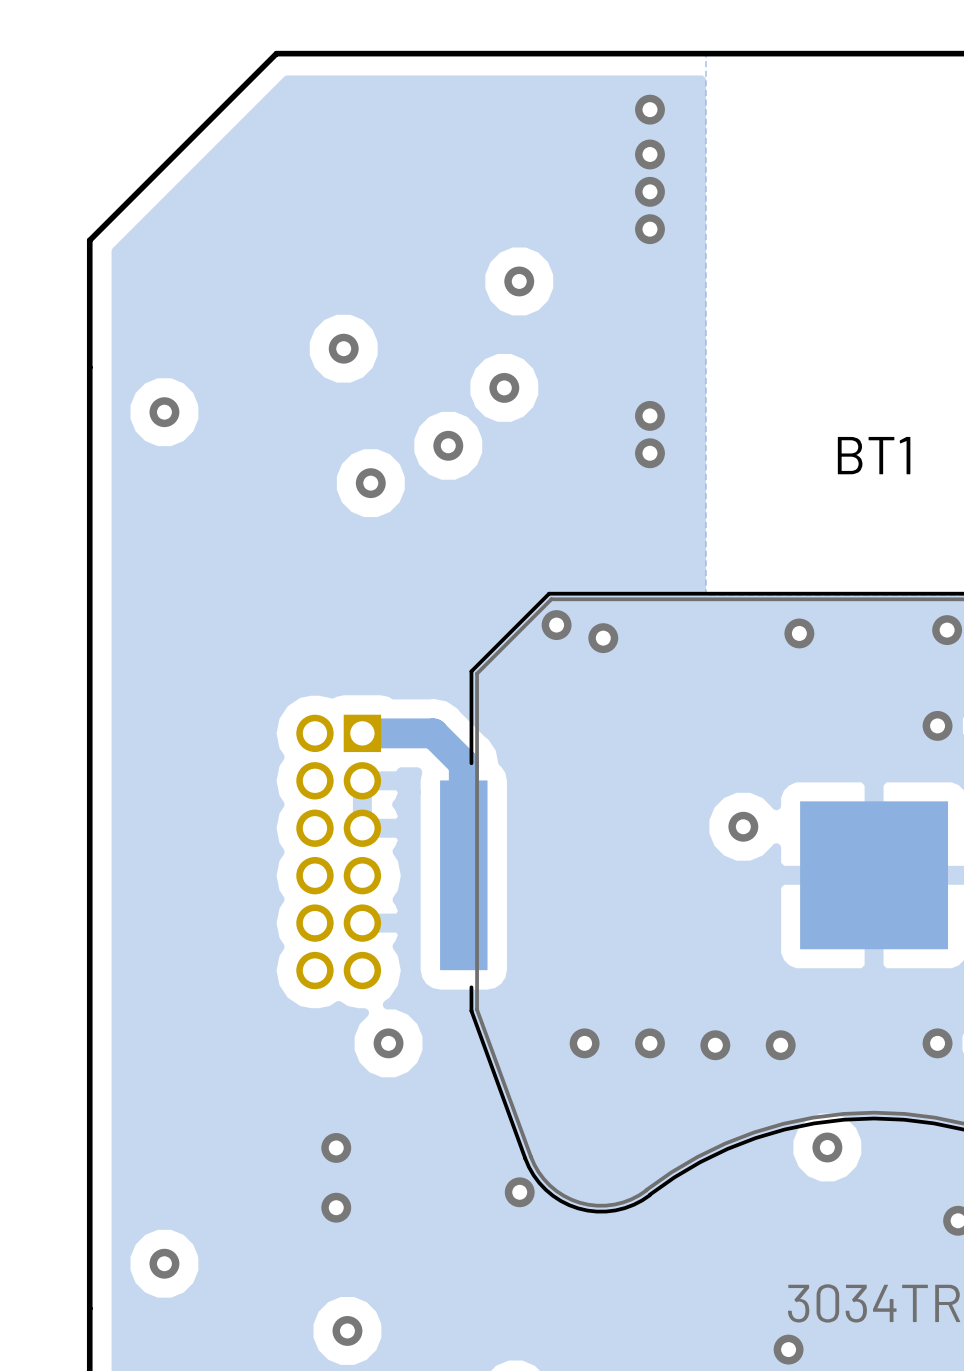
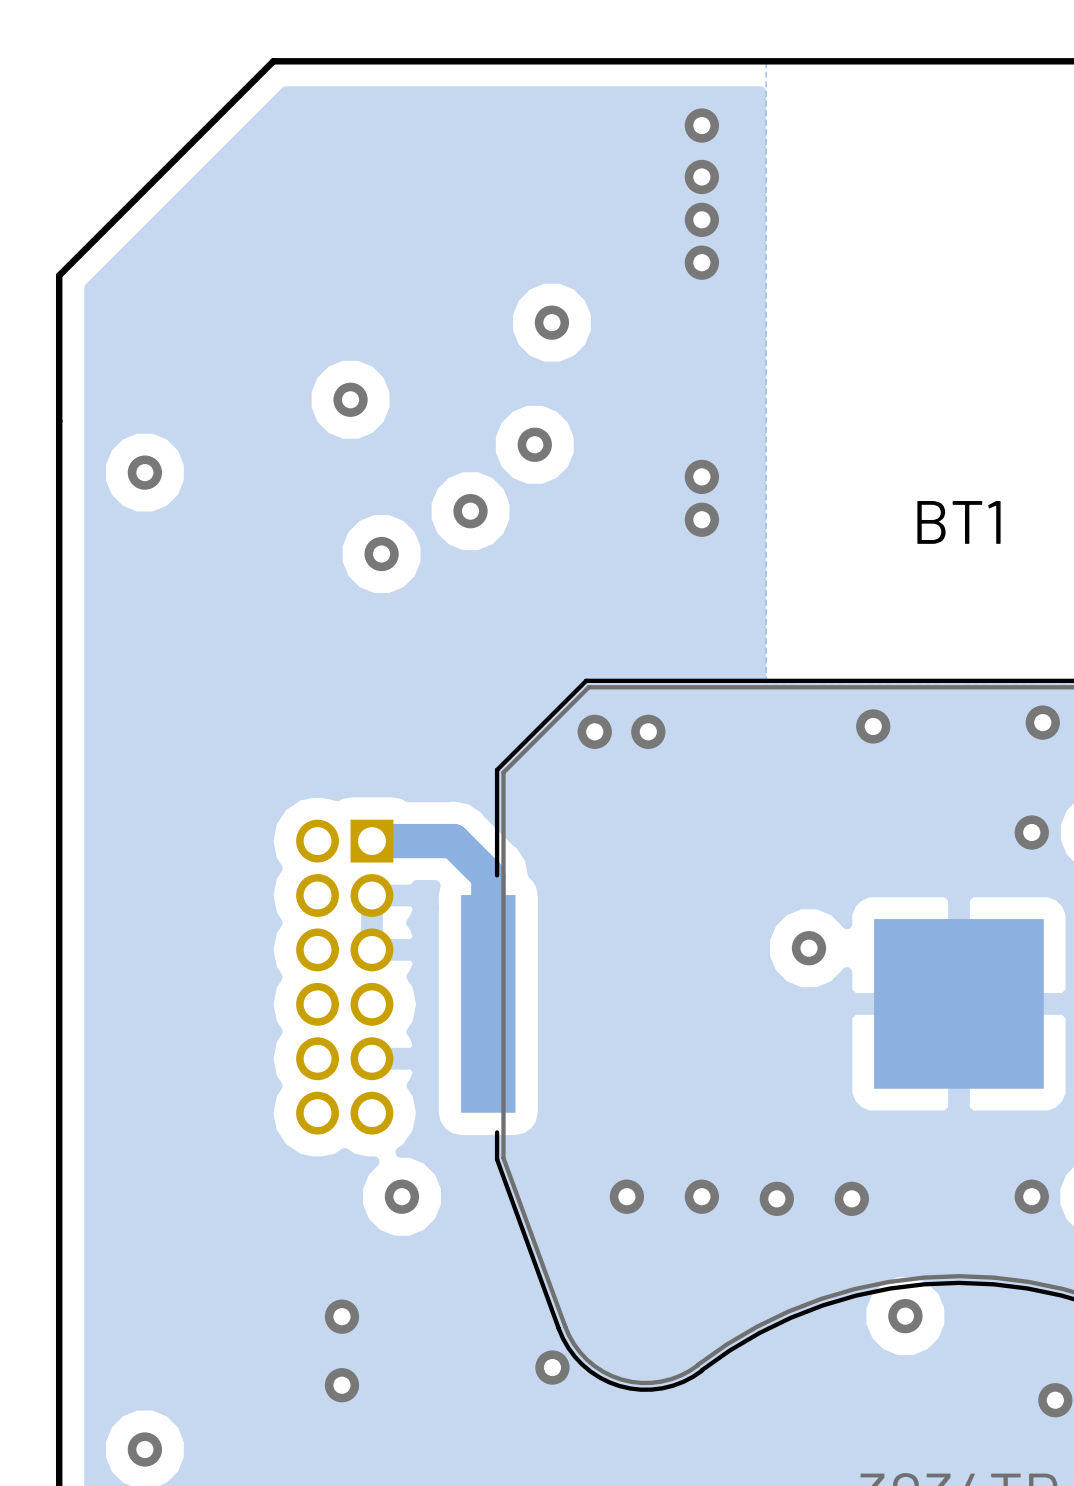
via position: (556, 625) -> (594, 731)

